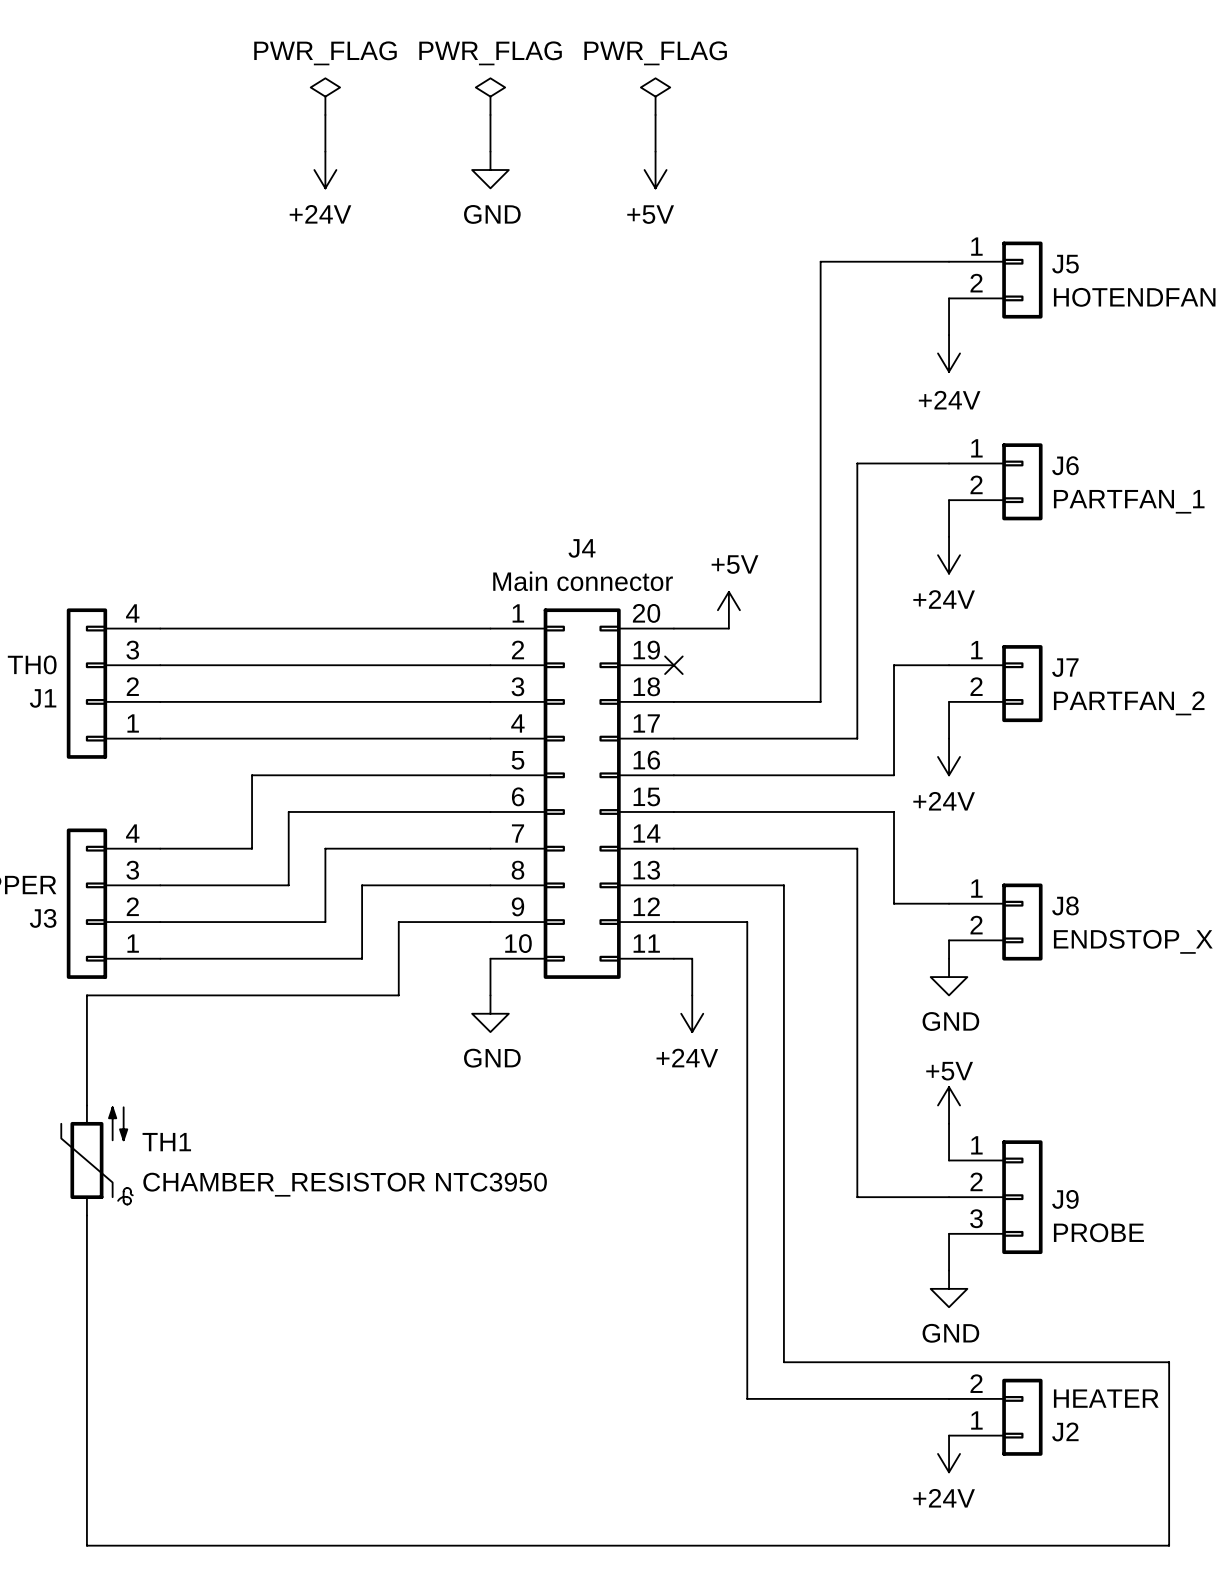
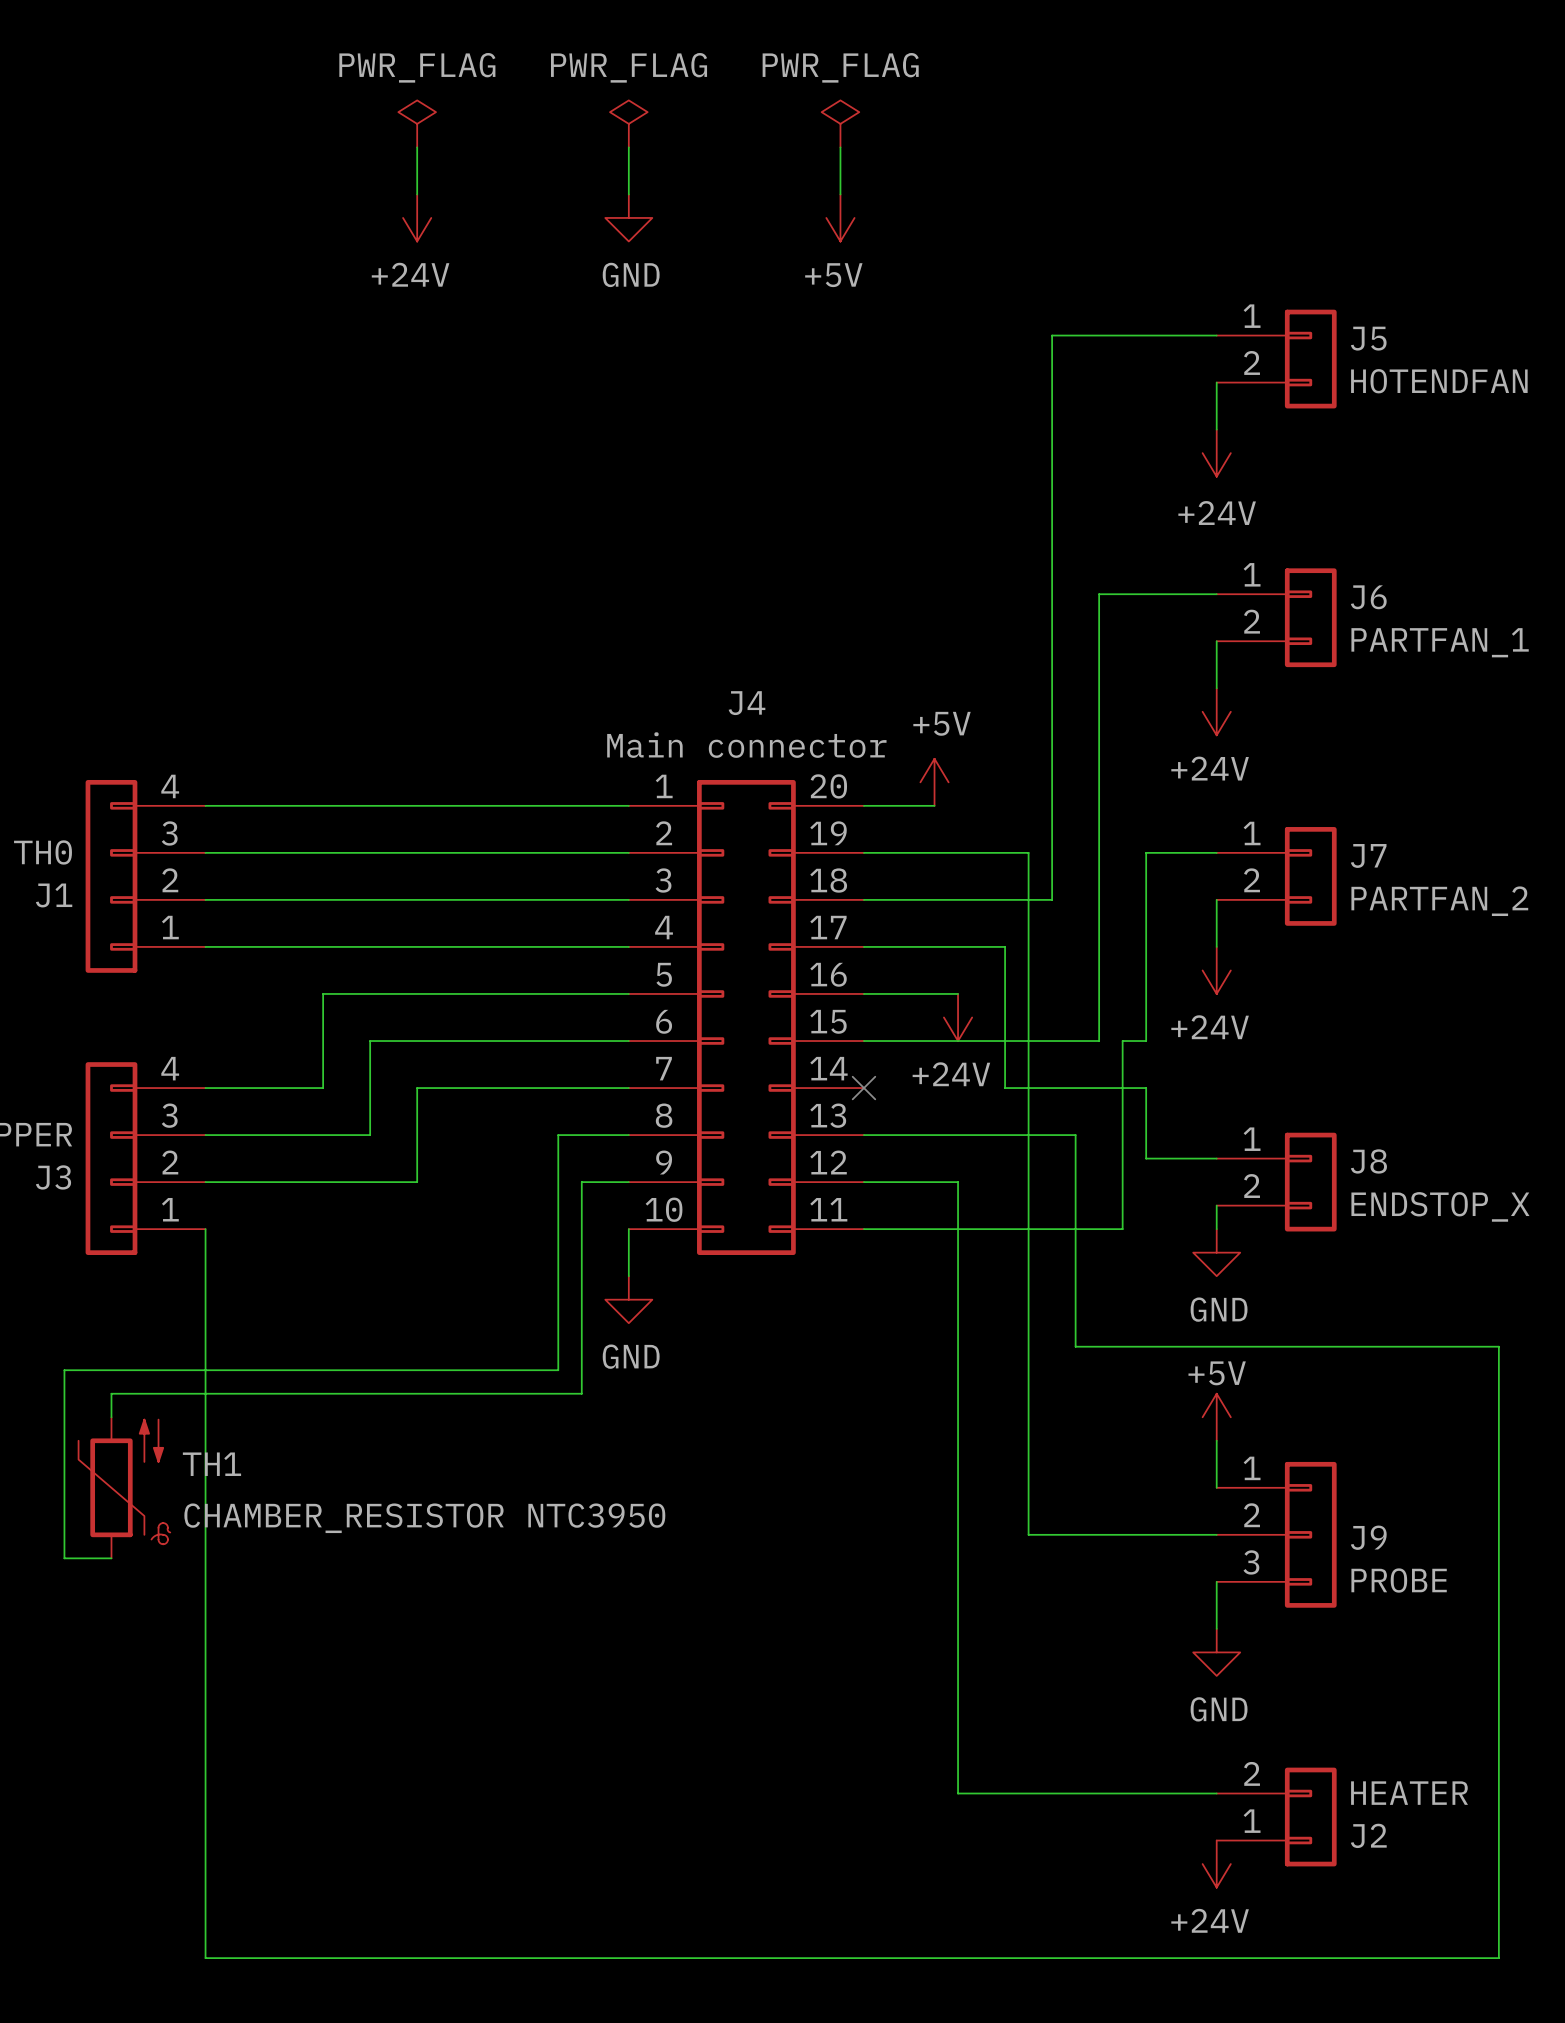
no-connect mark: (673, 665) -> none
wire: (783, 738) (857, 738) -> (1005, 946) (1005, 1088)
wire: (747, 775) (894, 775) -> (1146, 1041) (1146, 993)
wire: (857, 811) (875, 811) -> (1099, 1041) (1099, 946)
wire: (894, 811) (894, 848) -> (1099, 1088) (1146, 1088)
wire: (673, 848) (783, 848) -> none
no-connect mark: none -> (863, 1088)
wire: (857, 848) (857, 1197) -> (863, 852) (1028, 852) (1028, 1534) (1099, 1534)
wire: (435, 885) (362, 885) (362, 958) (160, 958) -> (558, 1135) (558, 1370) (64, 1370) (64, 1558) (111, 1558)
wire: (783, 885) (783, 1362) (1169, 1362) -> (1005, 1135) (1075, 1135) (1075, 1346) (1498, 1346) (1498, 1746)
wire: (453, 922) (398, 922) (398, 995) (86, 995) (86, 1087) -> (581, 1182) (581, 1393) (111, 1393)
wire: (692, 958) (692, 995) -> (887, 1229) (1122, 1229) (1122, 1041)
power symbol position: +24V (692, 1013) -> +24V (958, 1017)
wire: (86, 1215) (86, 1545) (1169, 1545) (1169, 1527) -> (205, 1229) (205, 1958) (1498, 1958)

